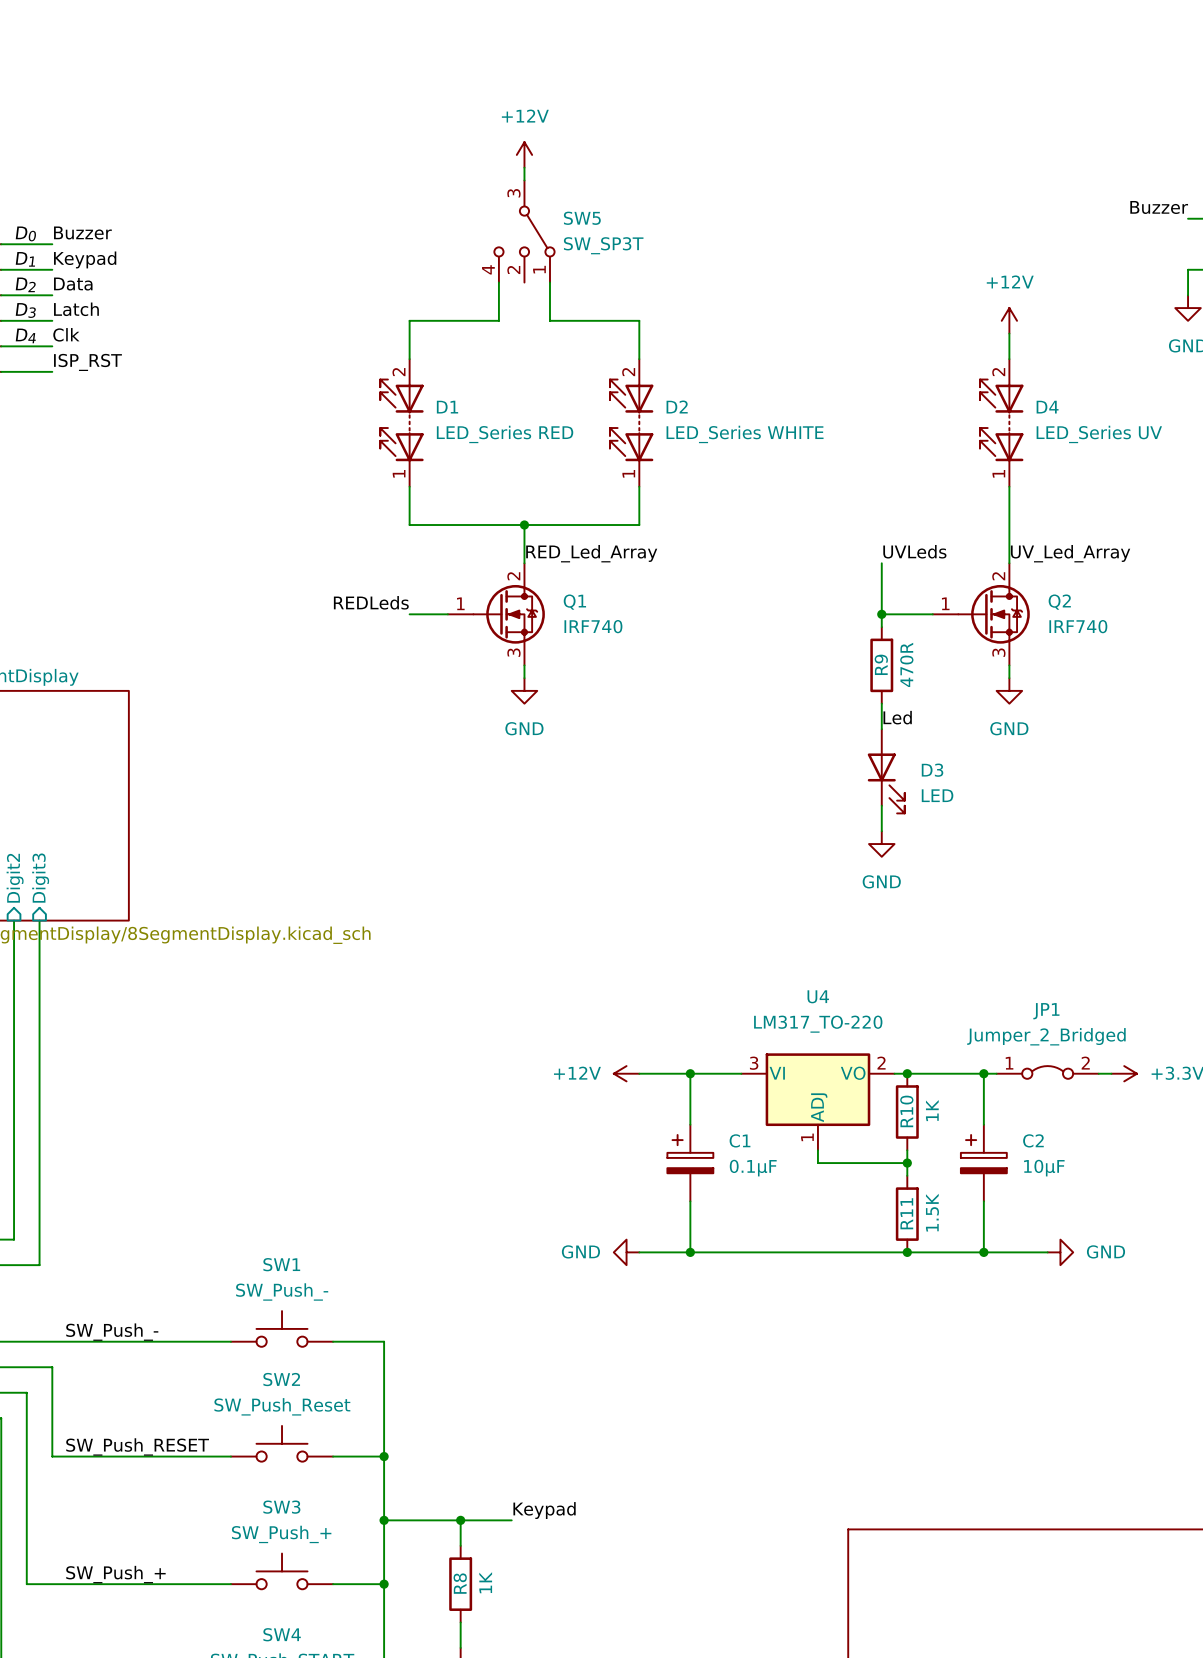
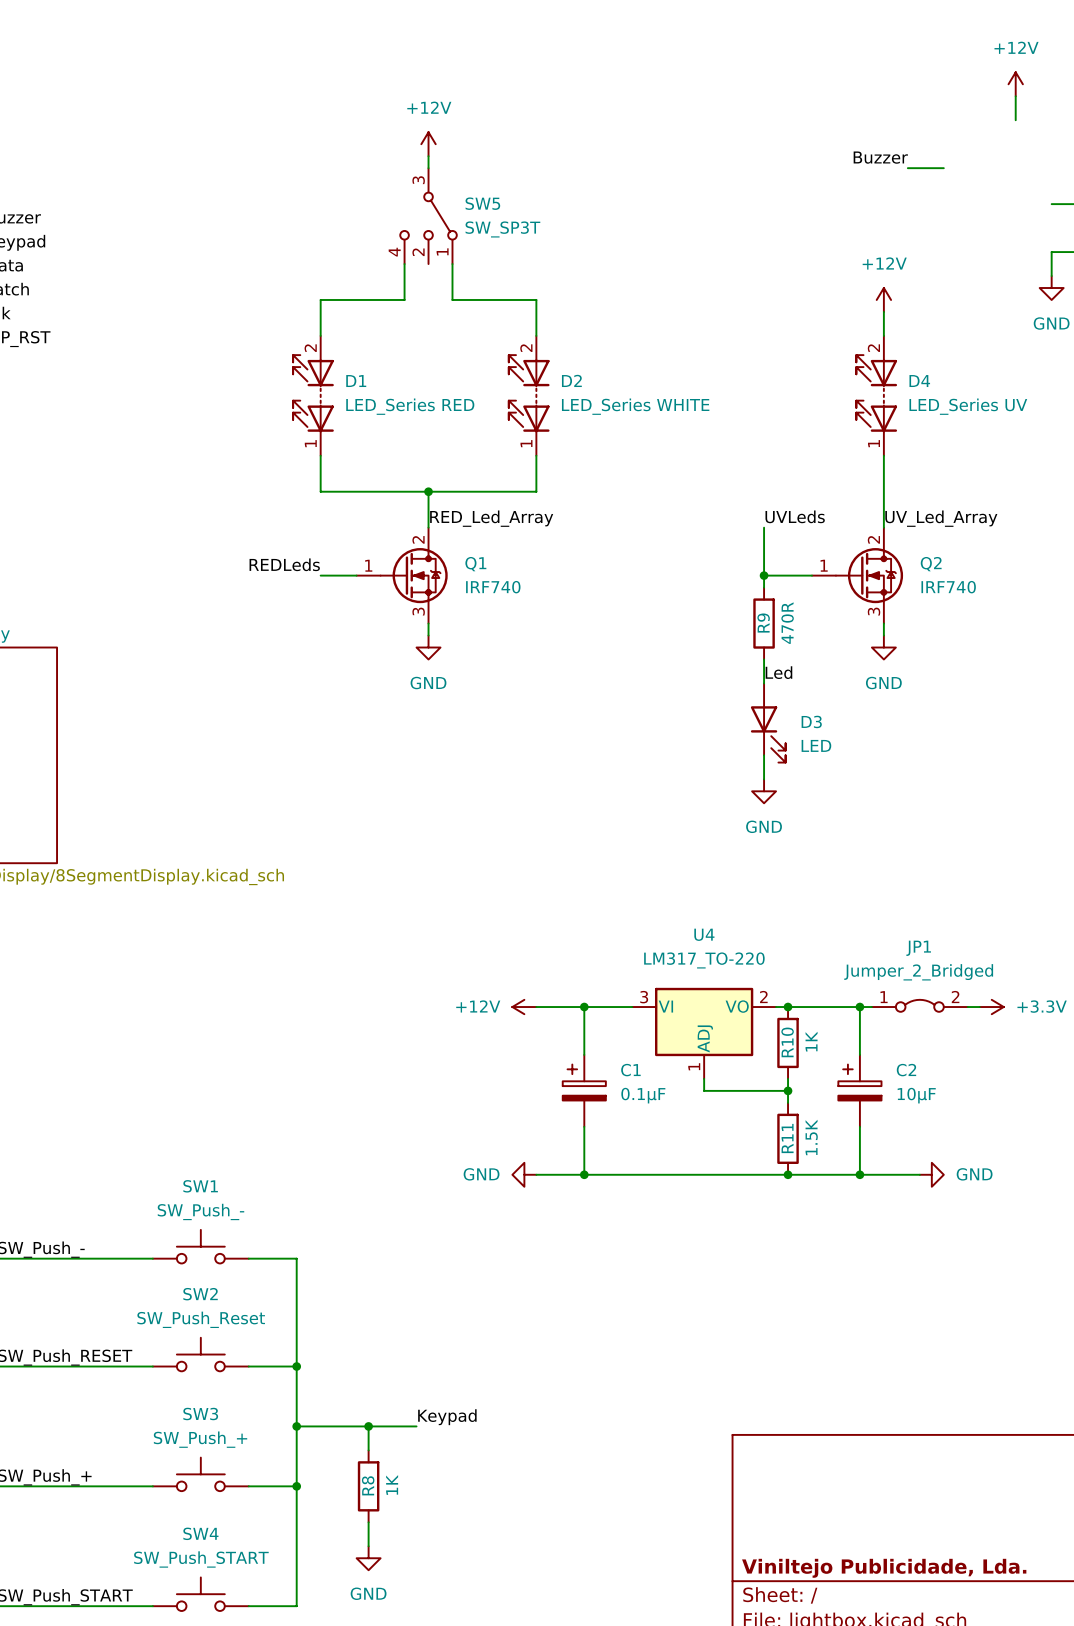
power symbol: none -> +12V (1015, 84)
wire: none -> (1015, 96) (1015, 120)
wire: none -> (907, 168) (943, 168)
label position: Buzzer (1159, 207) -> Buzzer (880, 157)

